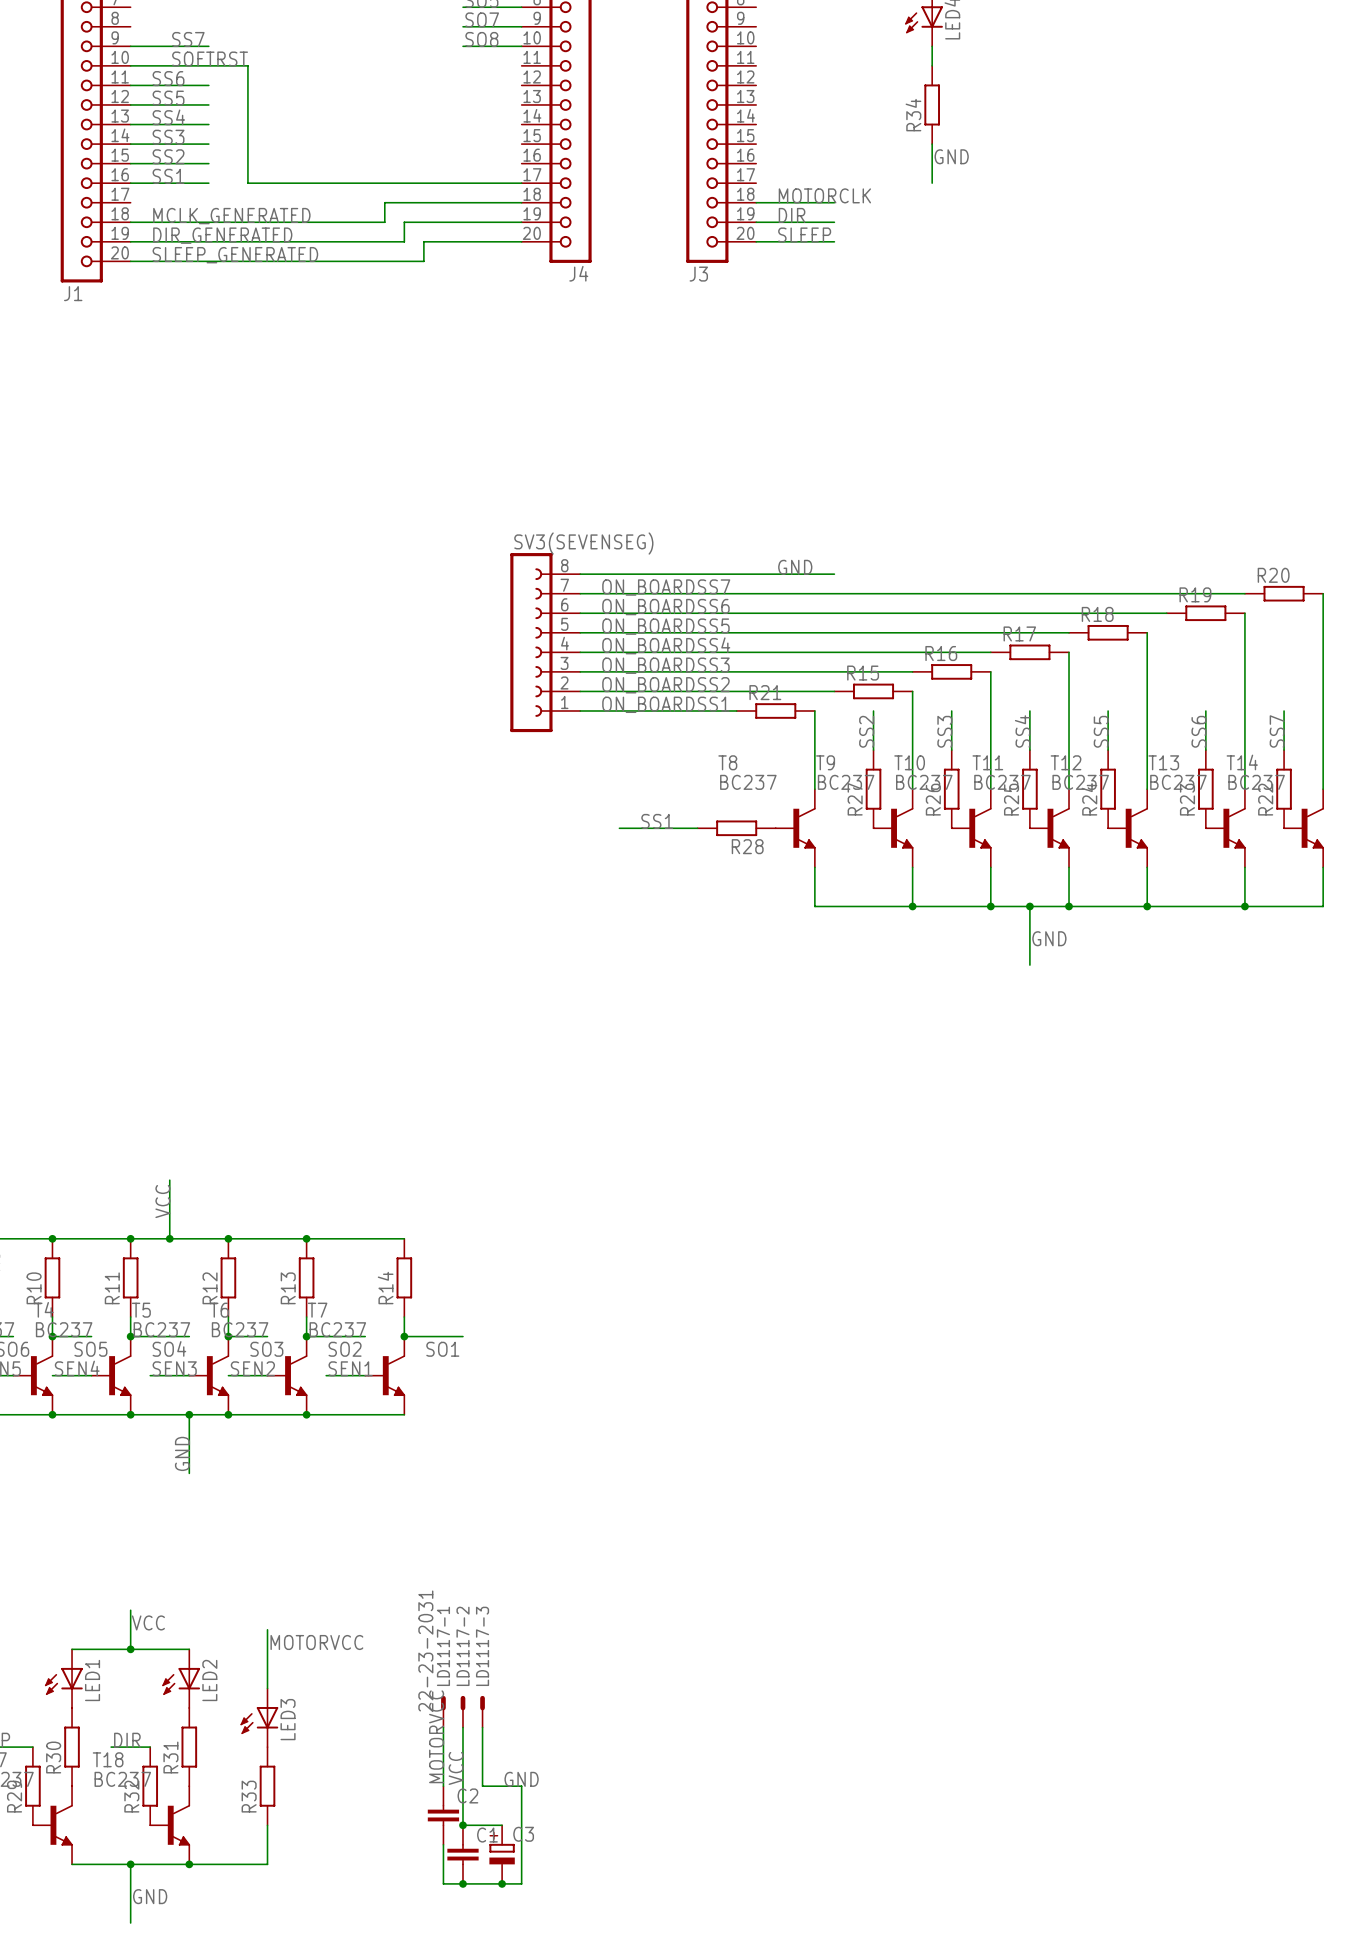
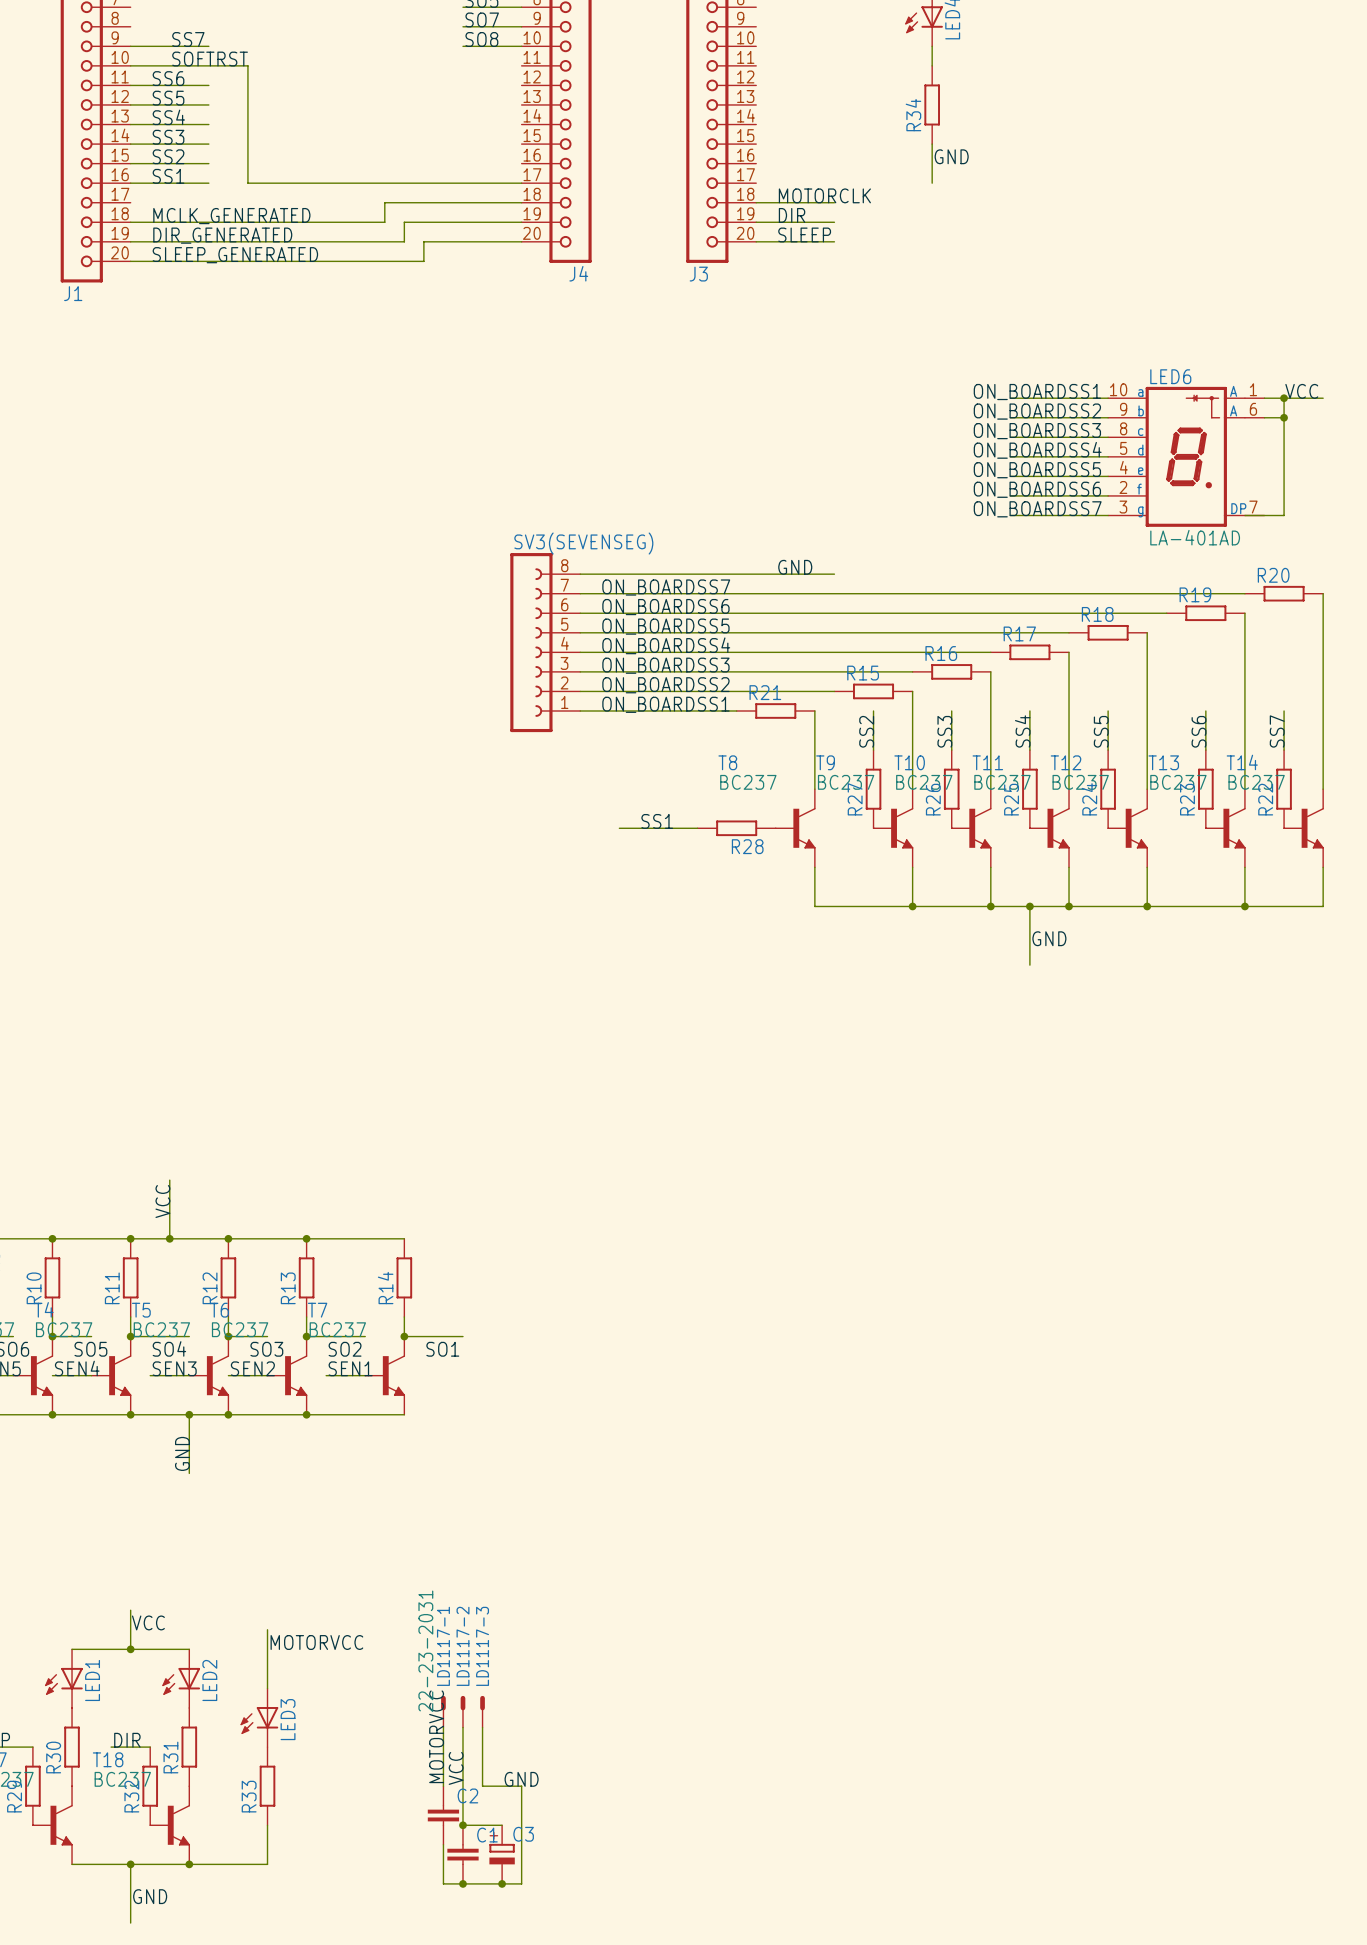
label: none -> VCC (1301, 391)
label: none -> ON_BOARDSS1 (1037, 392)
wire: none -> (1010, 398) (1108, 398)
wire: none -> (1264, 398) (1323, 398)
wire: none -> (1284, 398) (1284, 515) (1244, 515)
junction: none -> (1284, 398)
label: none -> ON_BOARDSS2 (1037, 411)
wire: none -> (1010, 417) (1108, 417)
wire: none -> (1264, 417) (1284, 417)
junction: none -> (1284, 417)
label: none -> ON_BOARDSS3 (1037, 431)
wire: none -> (1010, 437) (1108, 437)
label: none -> ON_BOARDSS4 (1037, 450)
wire: none -> (1010, 456) (1108, 456)
LED6: none -> LA-401AD (1186, 456)
label: none -> ON_BOARDSS5 (1037, 470)
wire: none -> (1010, 476) (1108, 476)
label: none -> ON_BOARDSS6 (1037, 489)
wire: none -> (1010, 495) (1108, 495)
label: none -> ON_BOARDSS7 (1037, 509)
wire: none -> (1010, 515) (1108, 515)

